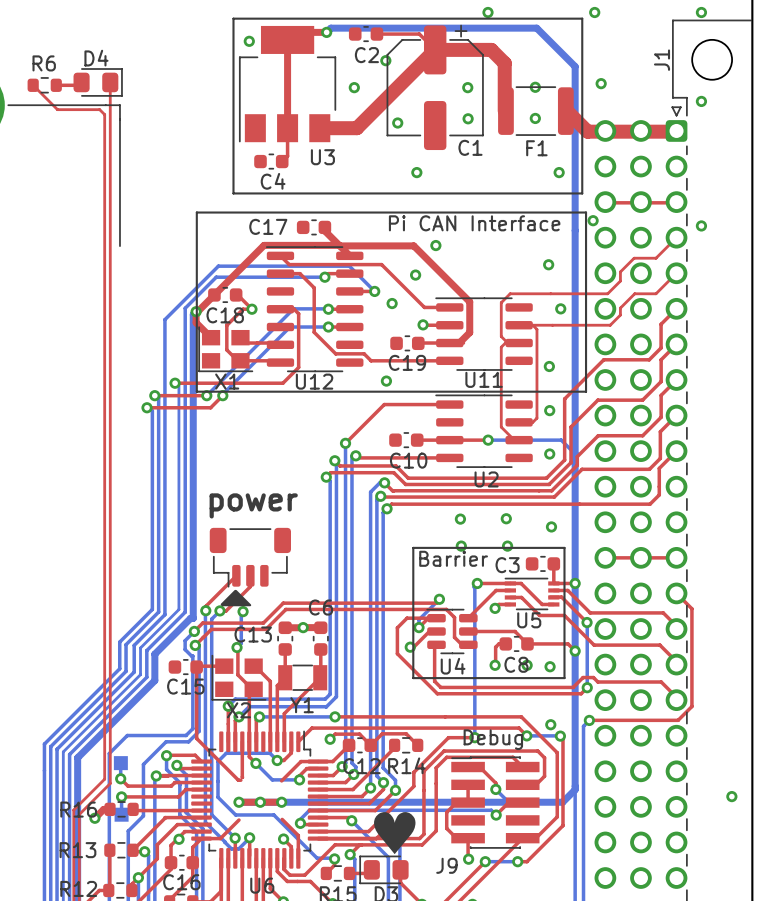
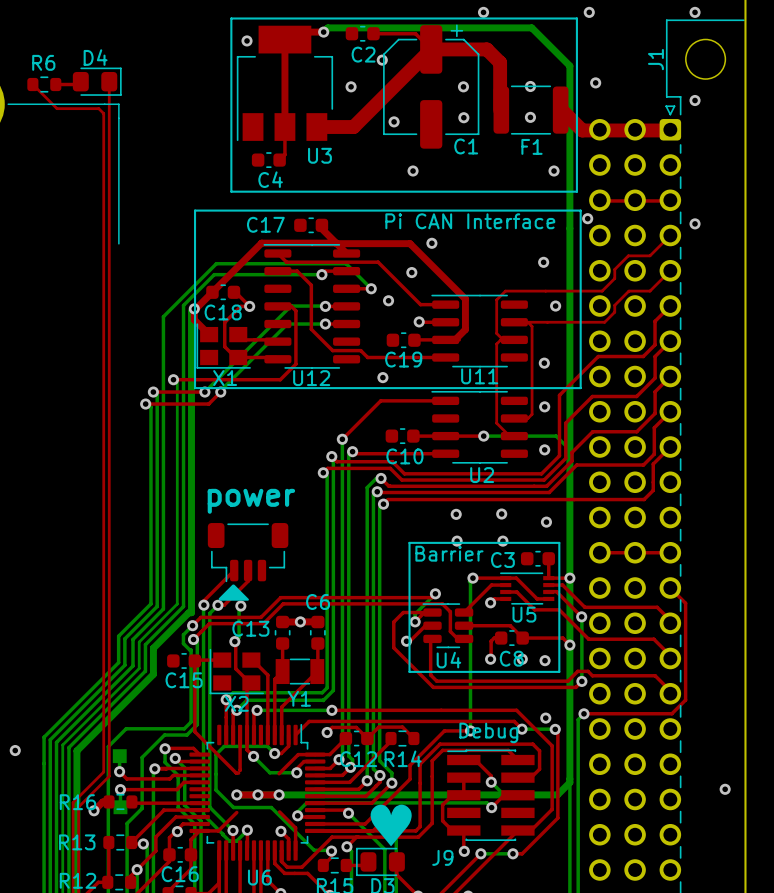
via: none -> (15, 750)

